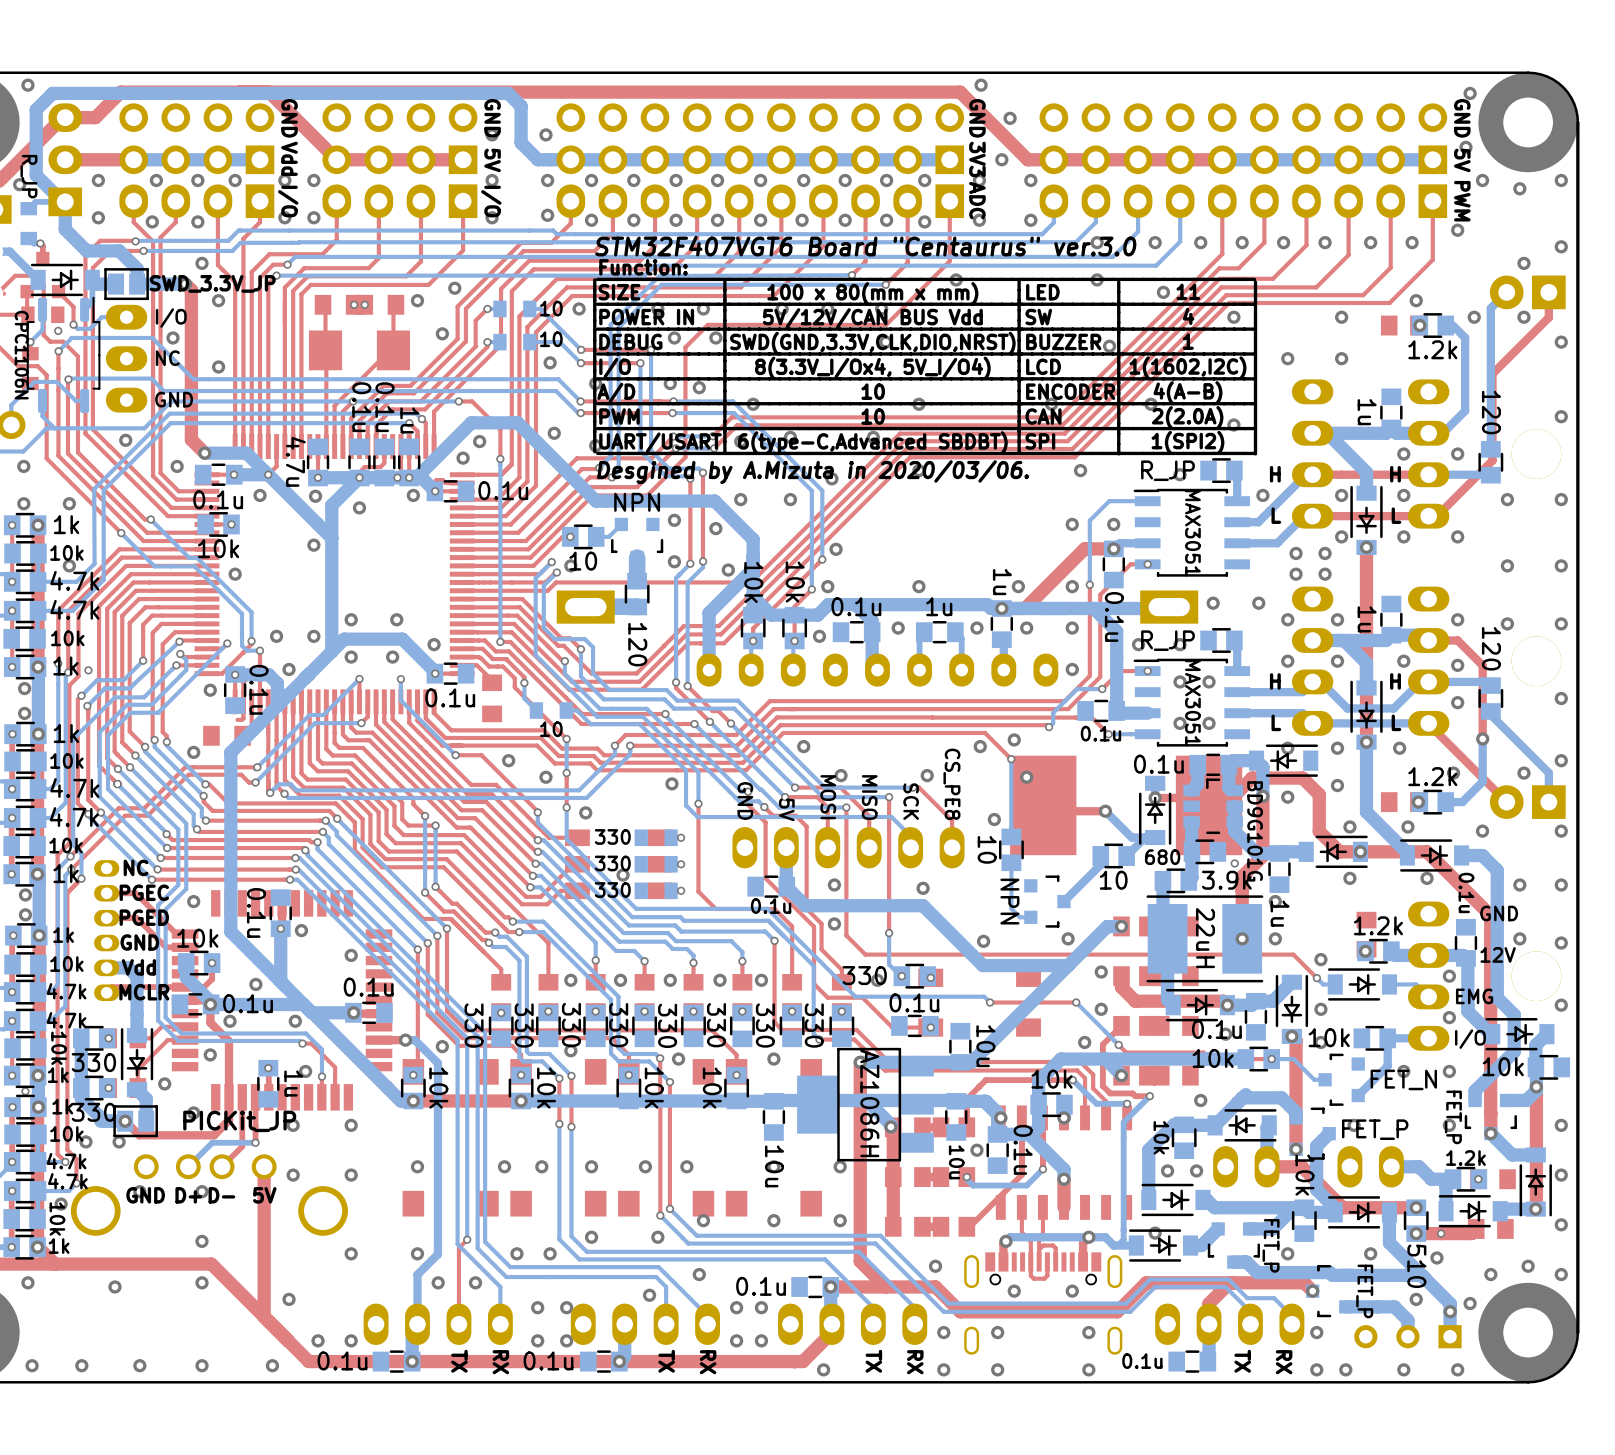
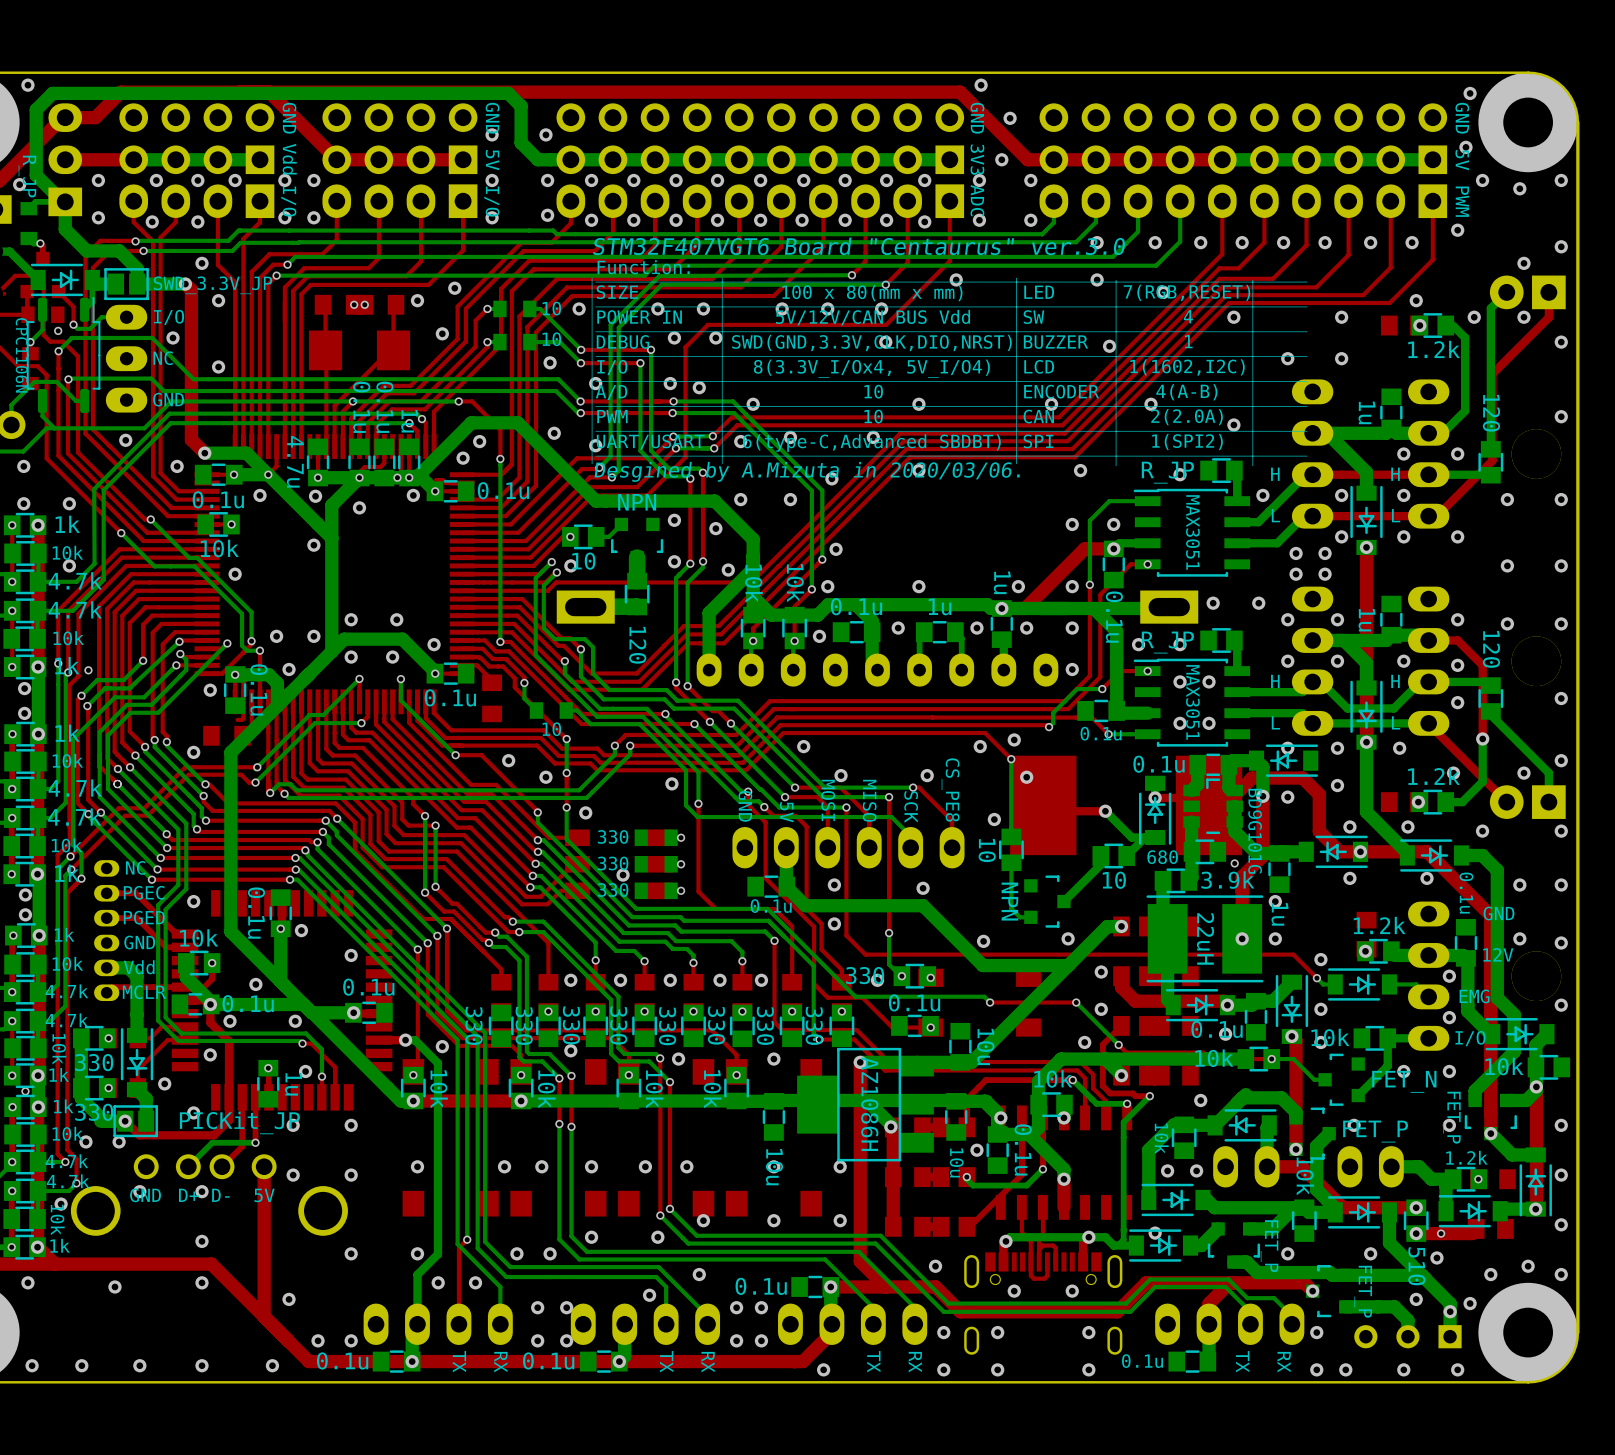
text: 11 (1188, 291) -> 7(RGB,RESET) (1187, 292)
via: (501, 1012) -> none

